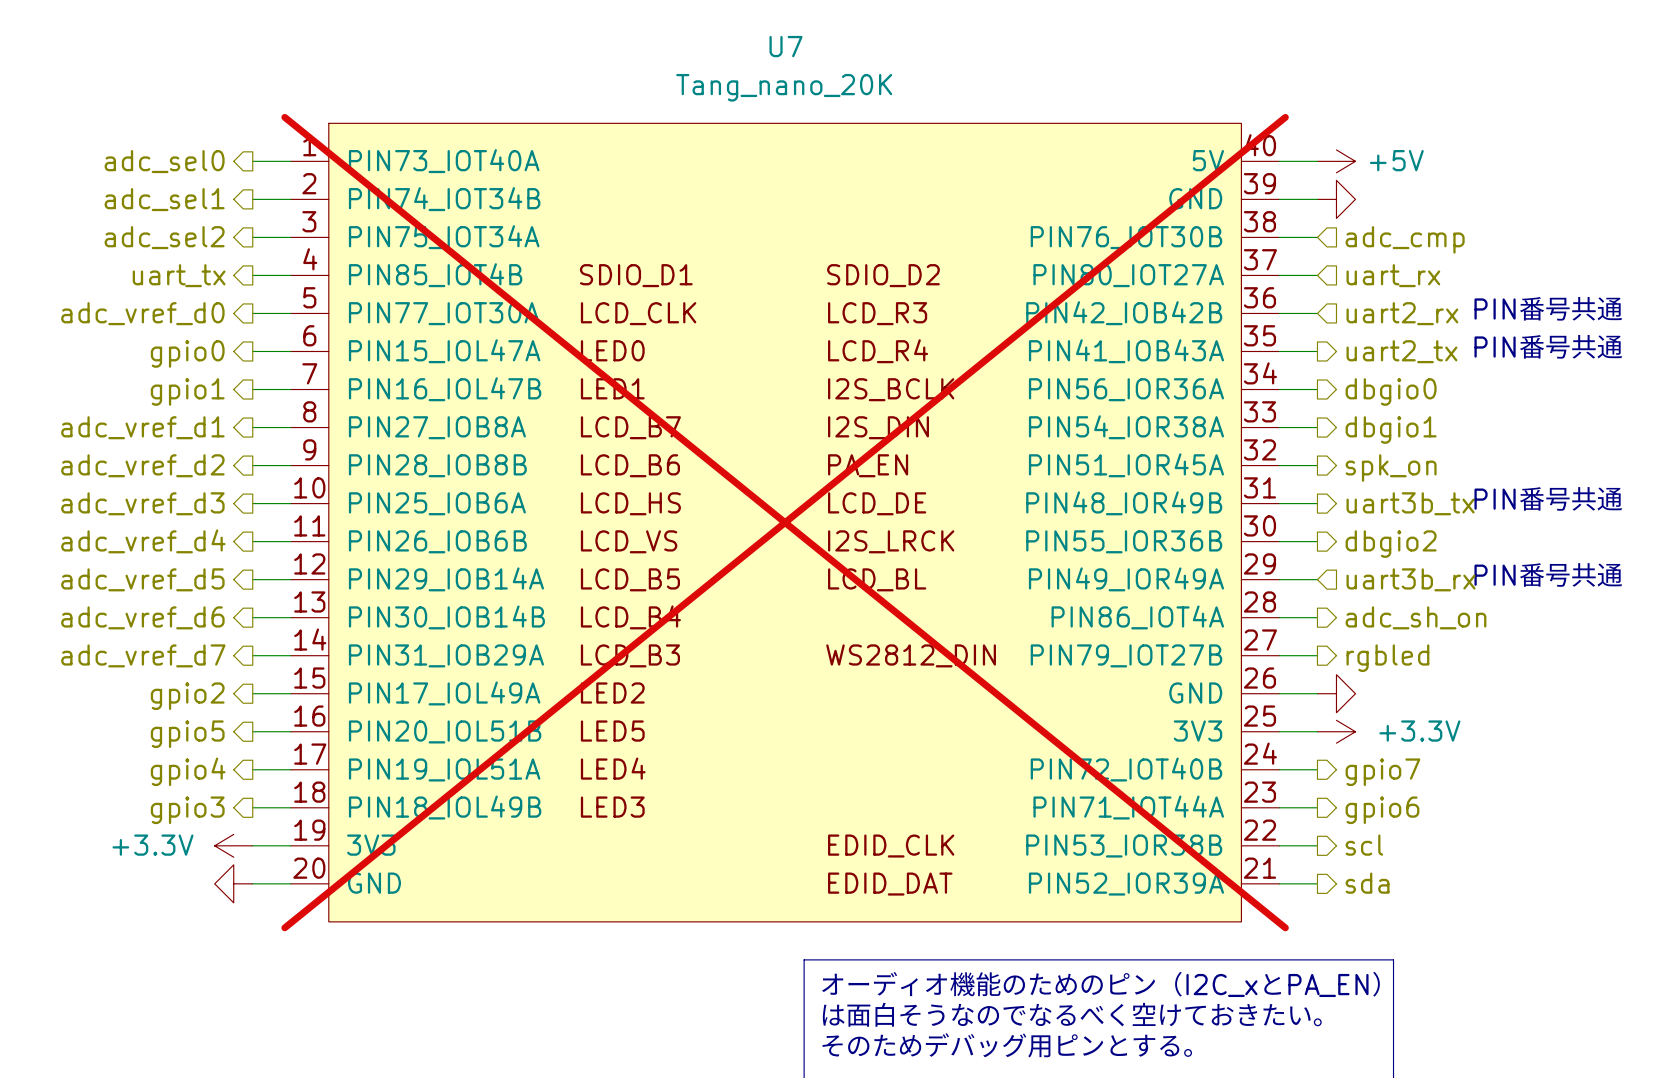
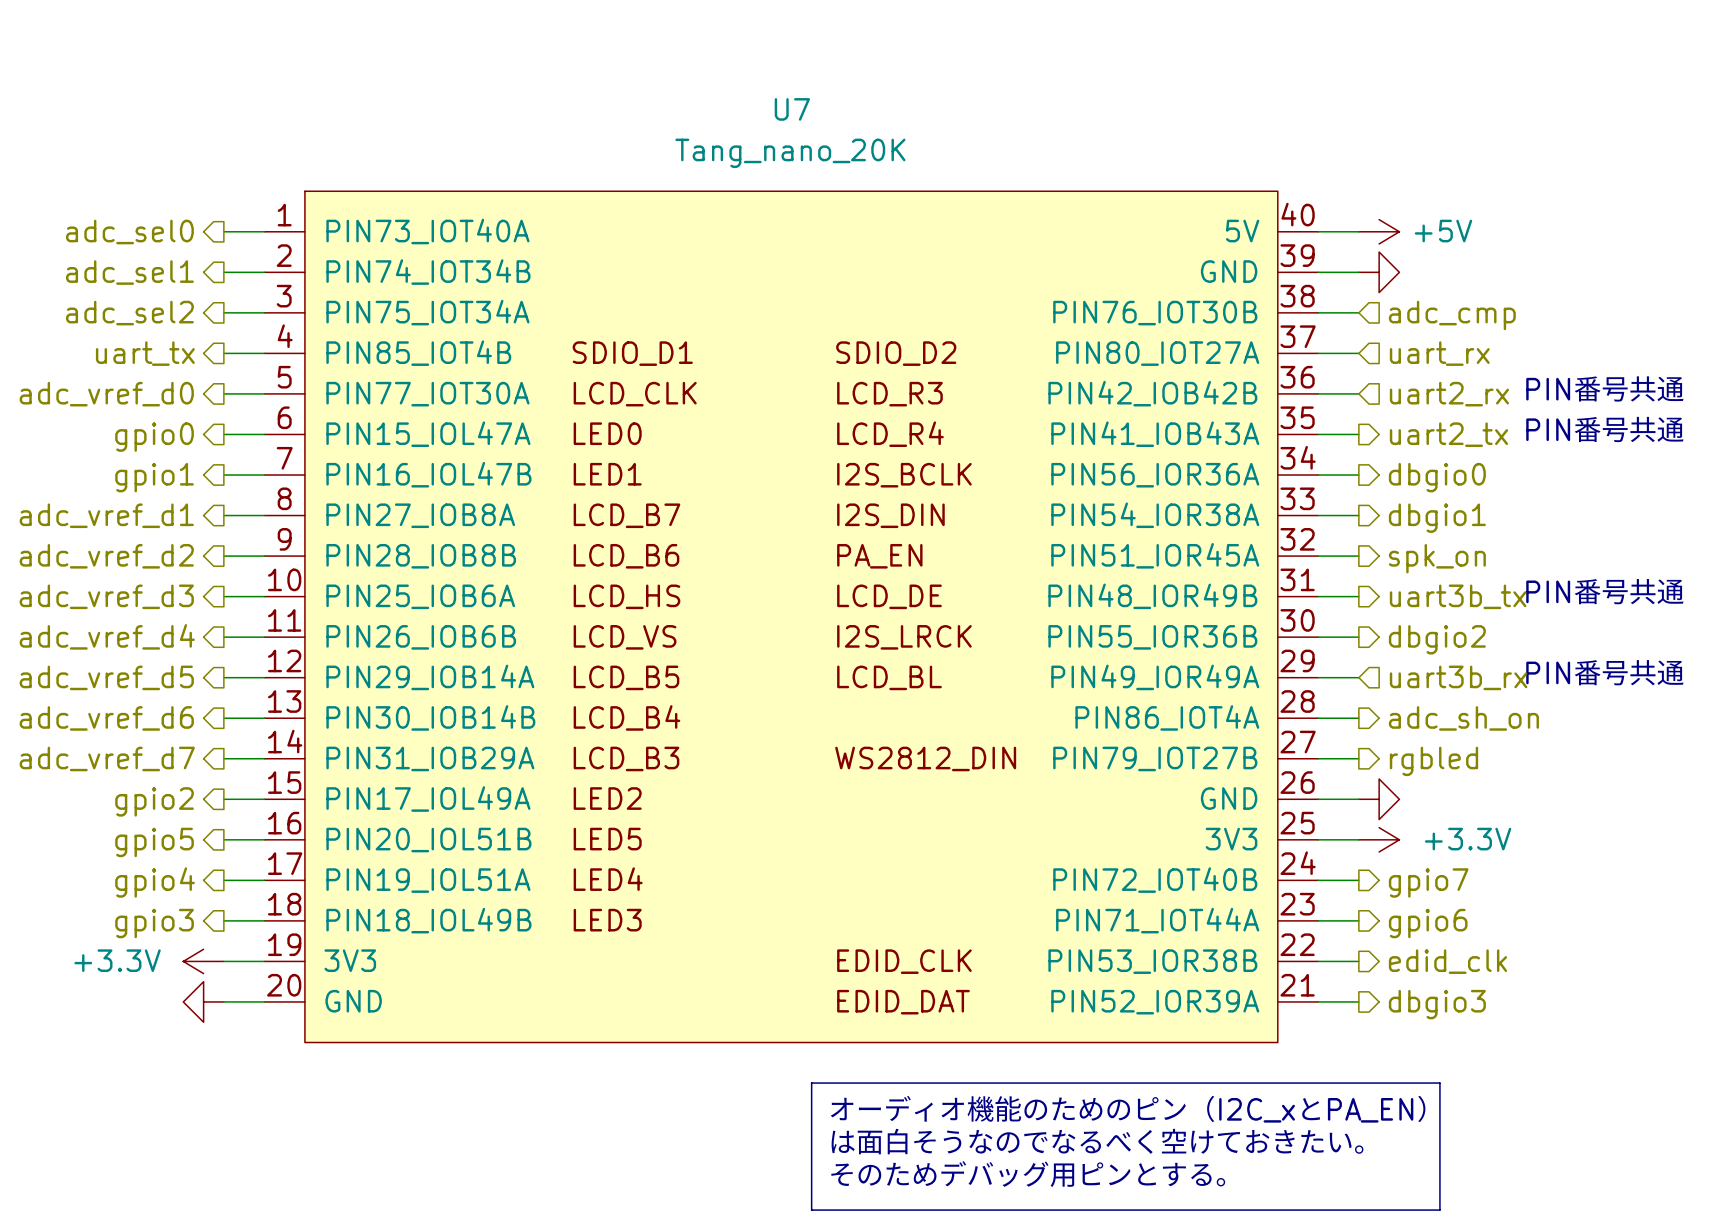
U7 do-not-place cross: (785, 522) -> none
hierarchical label: scl (1364, 845) -> edid_clk (1447, 961)
hierarchical label: sda (1367, 883) -> dbgio3 (1437, 1004)

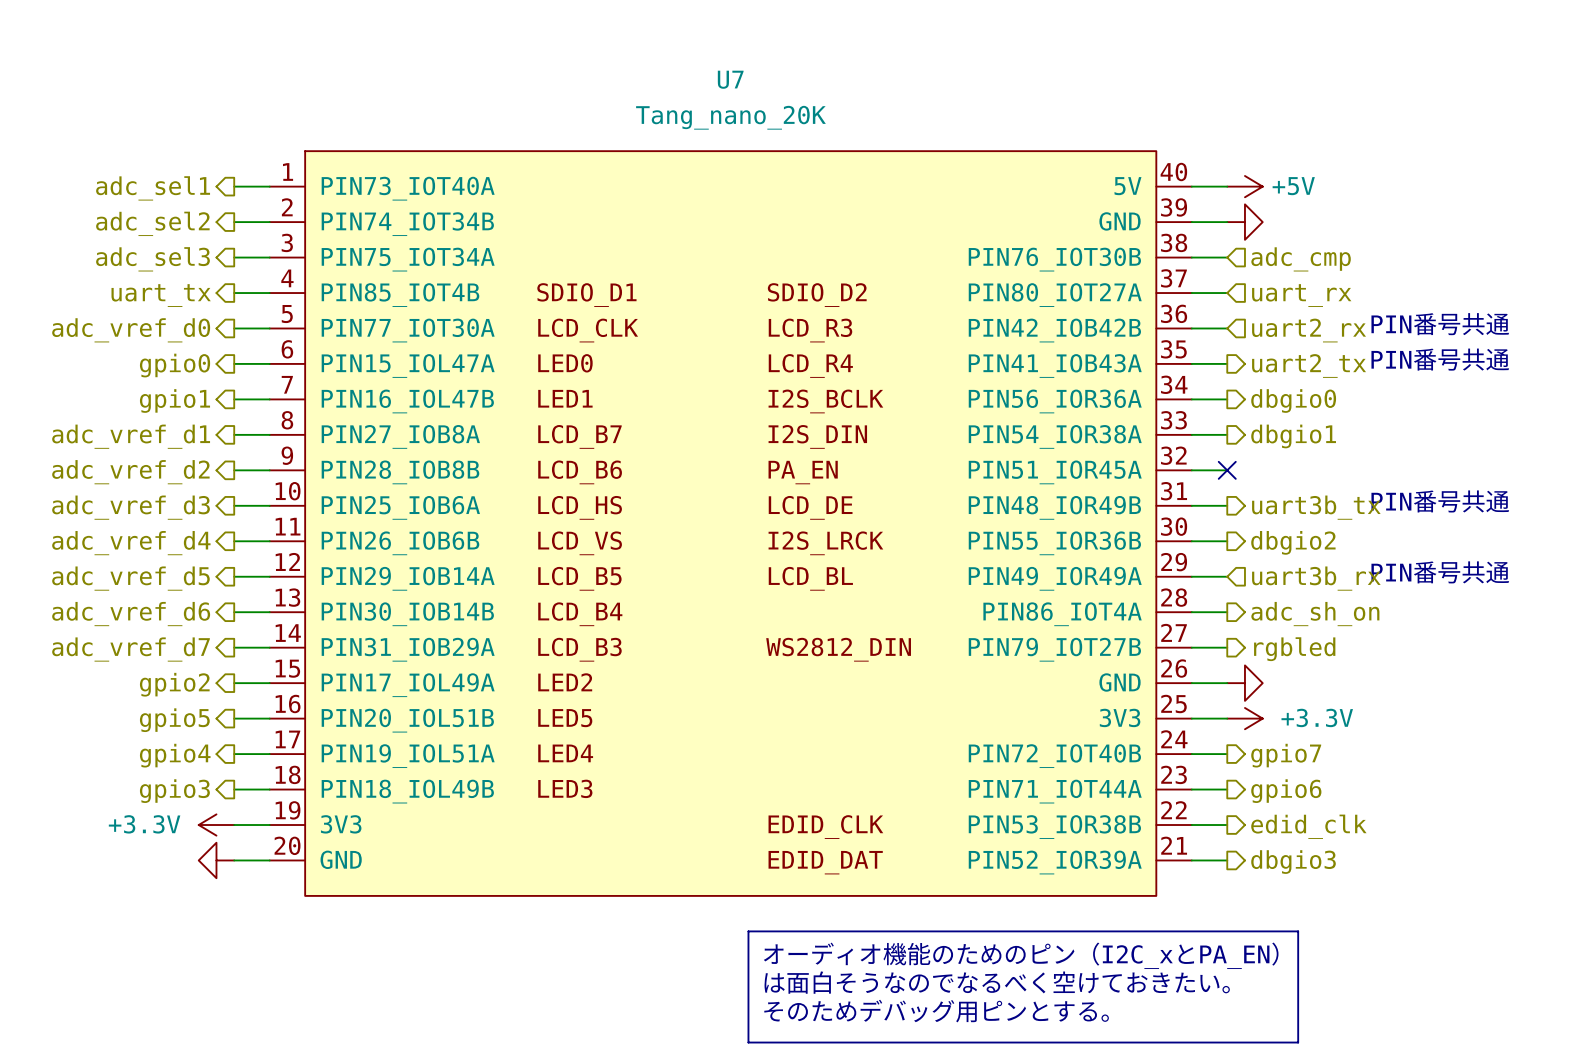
hierarchical label: adc_sel0 (129, 231) -> adc_sel1 (153, 188)
hierarchical label: adc_sel1 (129, 272) -> adc_sel2 (152, 223)
hierarchical label: adc_sel2 (129, 313) -> adc_sel3 (152, 259)
no-connect mark: none -> (1227, 470)
hierarchical label: spk_on (1437, 558) -> none

